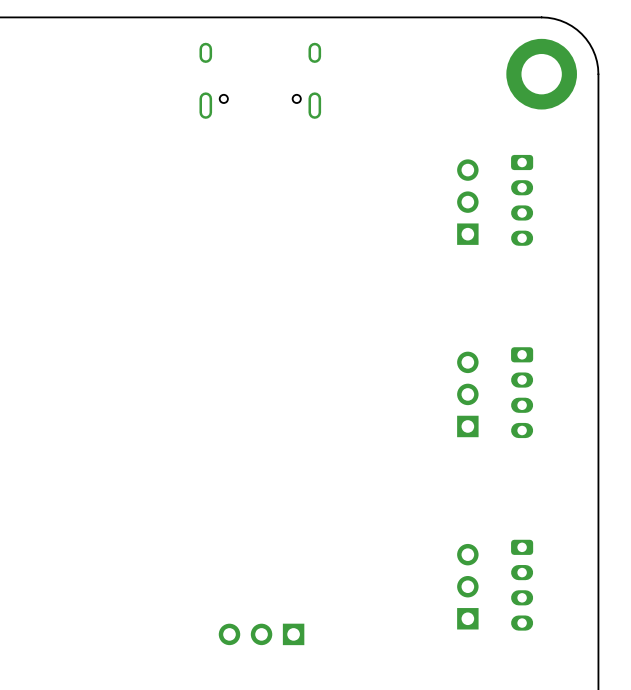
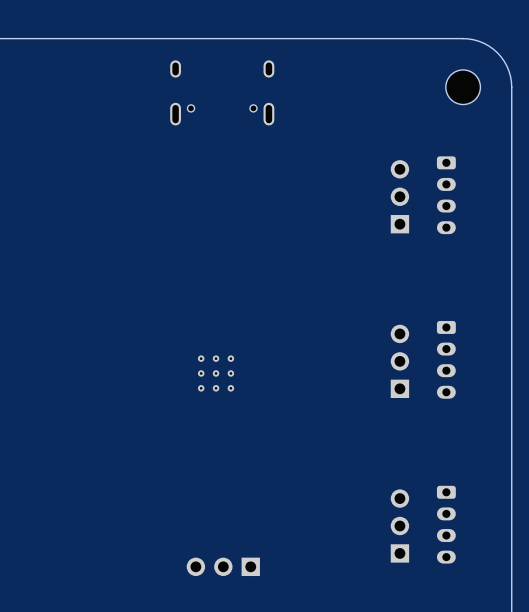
part footprint: [506, 38, 577, 110] -> [445, 69, 481, 105]
part: none -> (216, 373)

